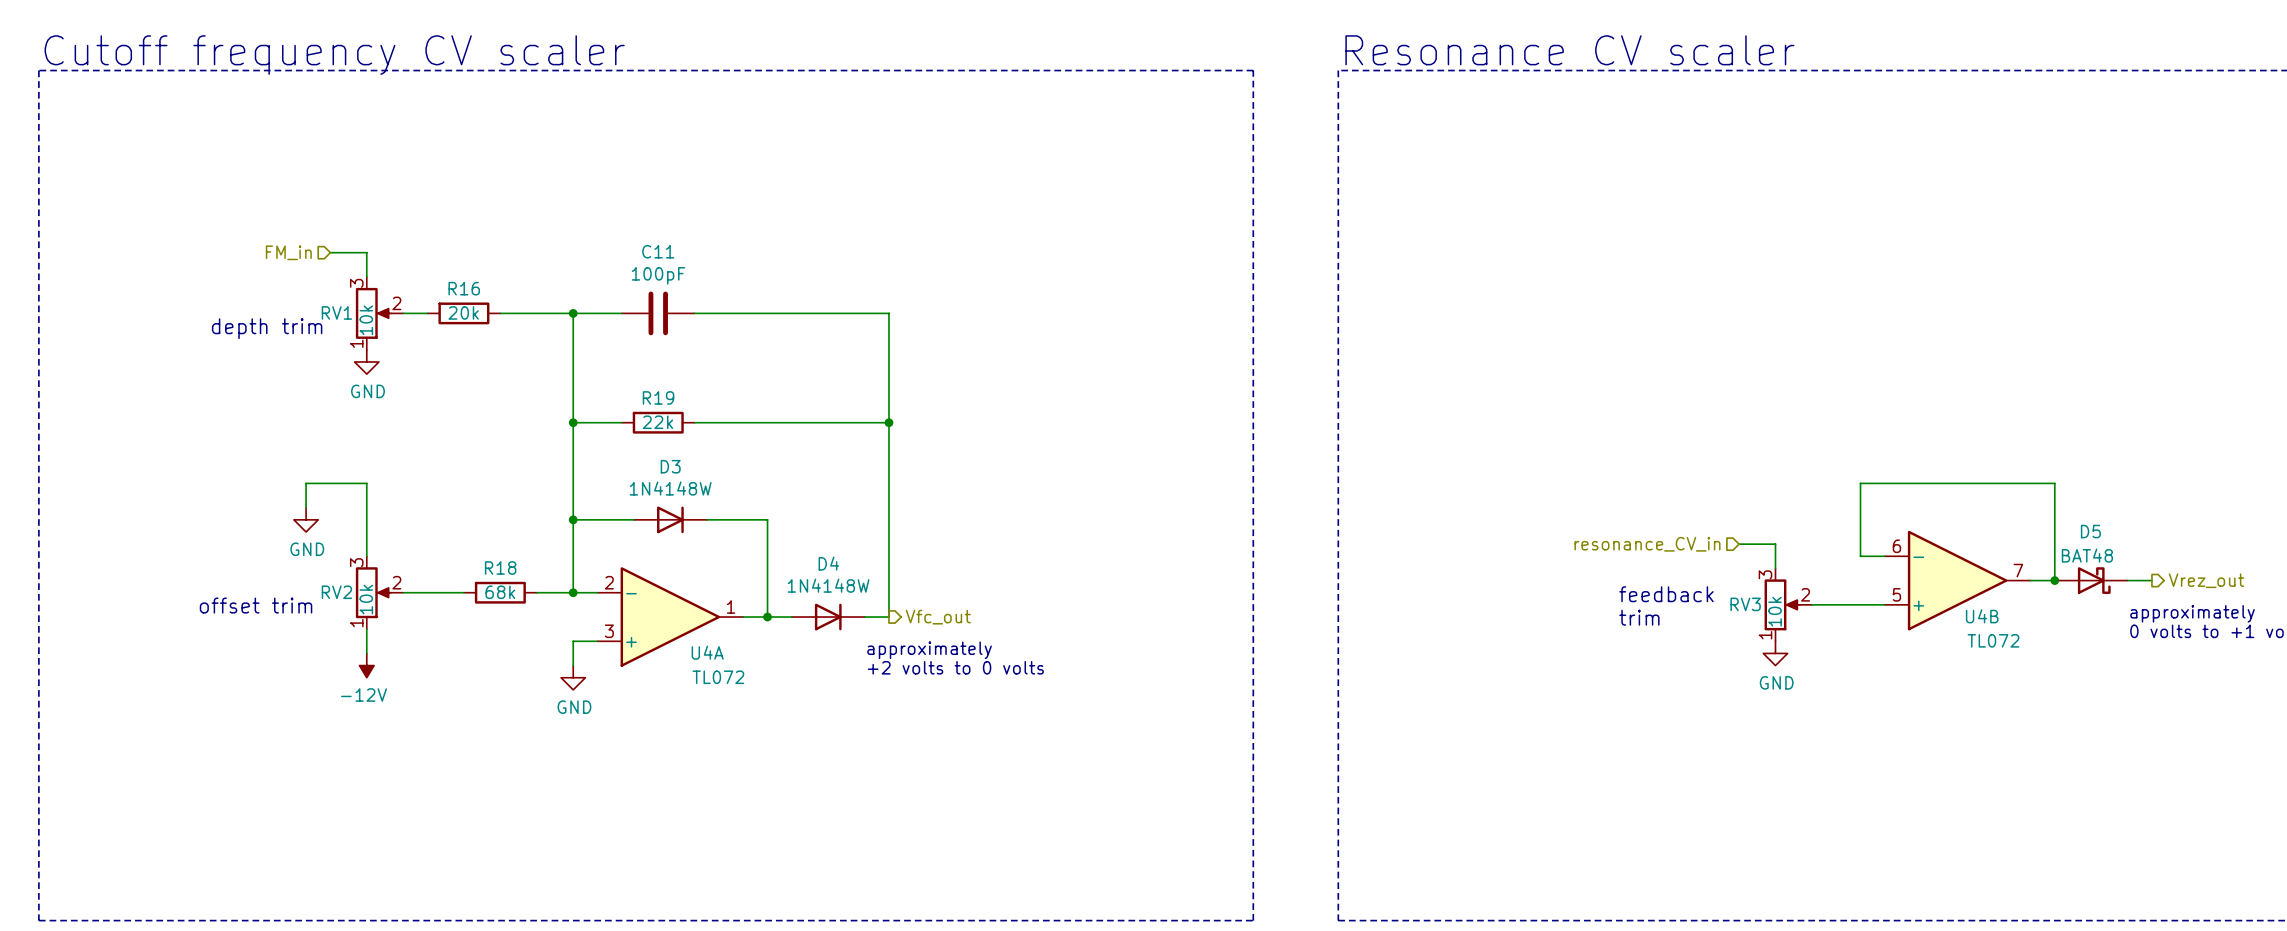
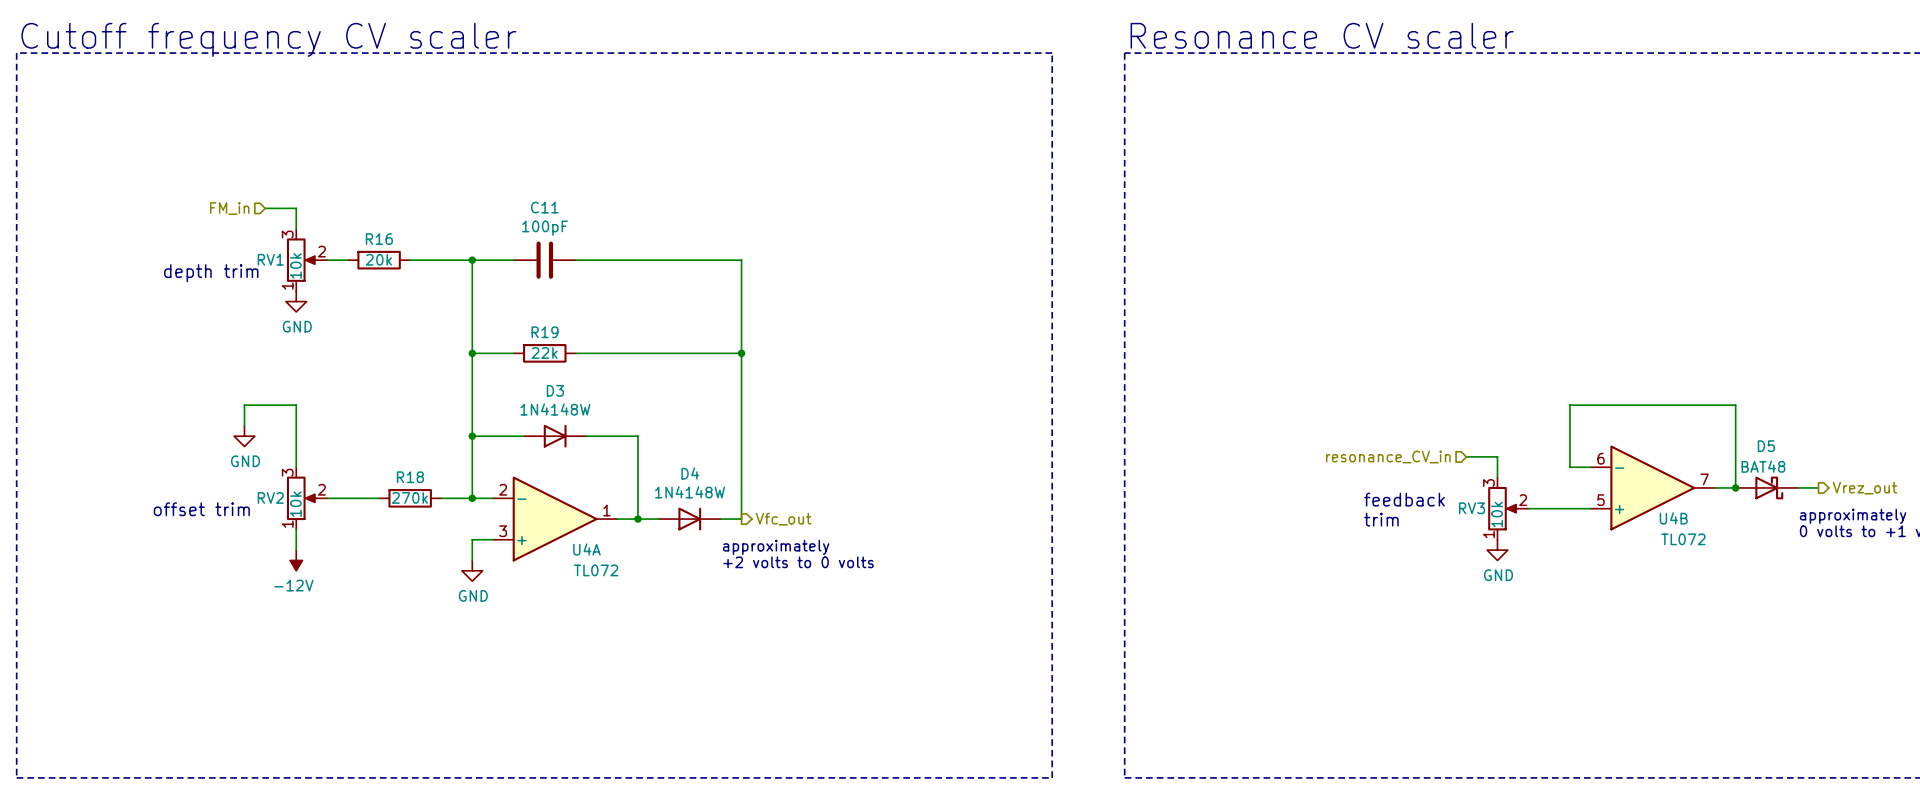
R18 value: 68k (500, 592) -> 270k (409, 497)

